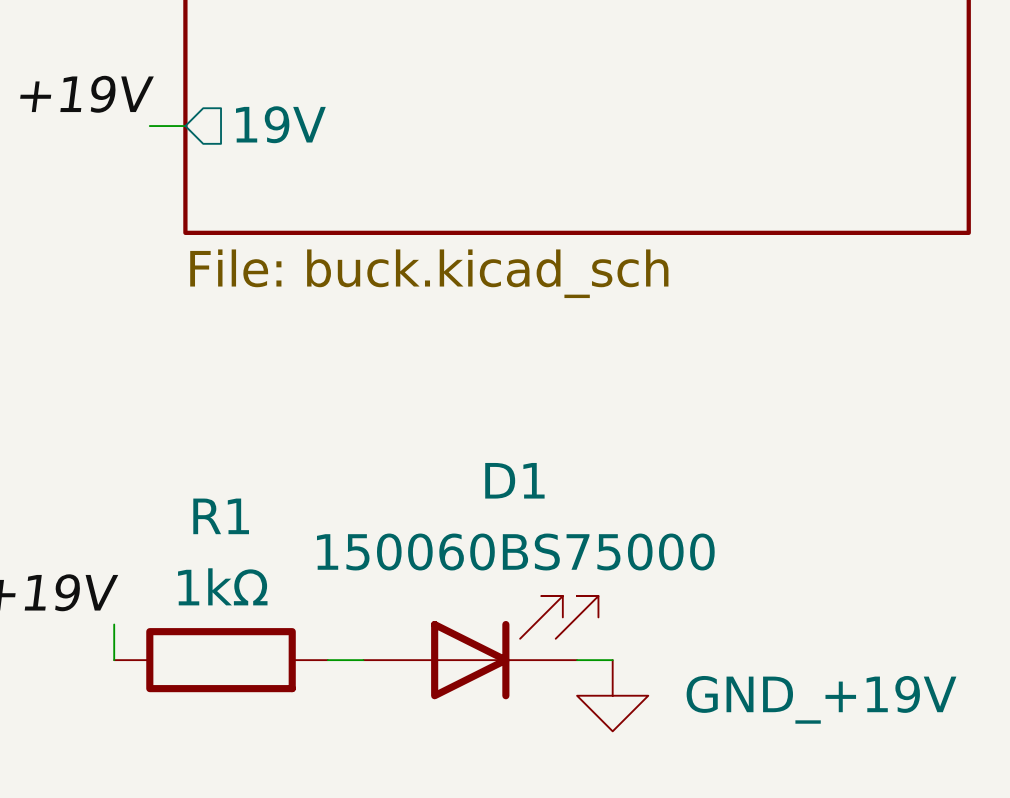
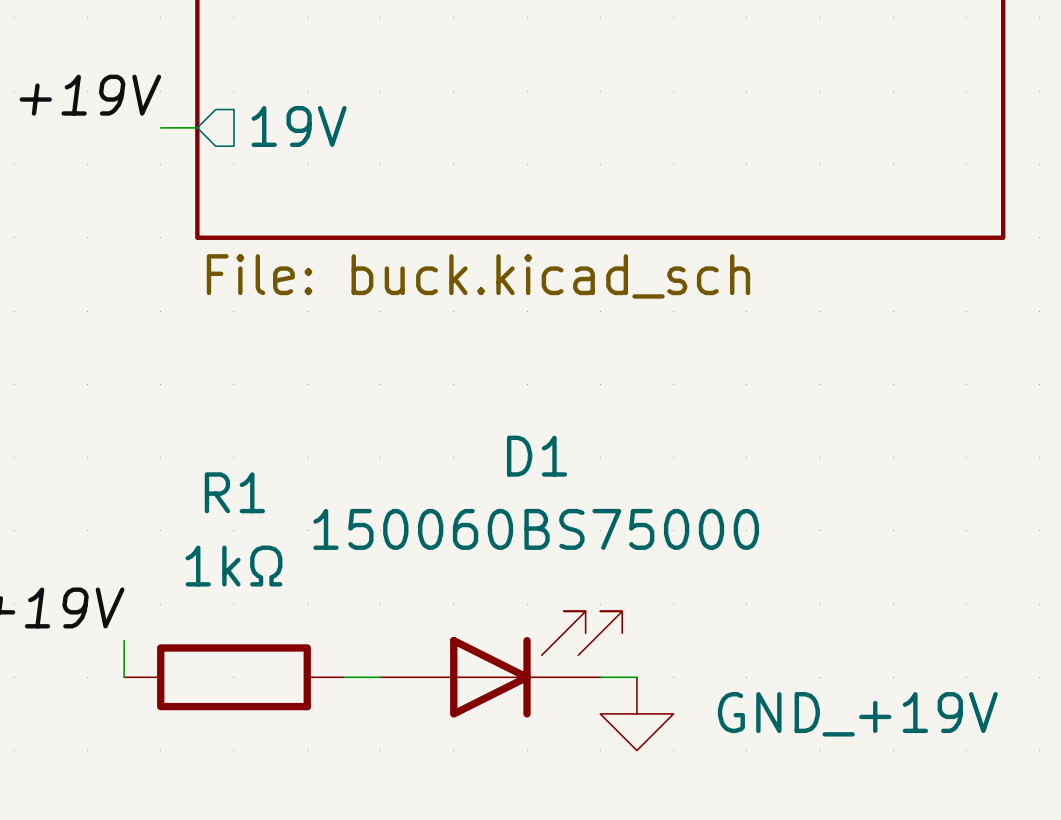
D1 name position: D1 (514, 480) -> D1 (537, 456)
R1 name position: R1 (221, 516) -> R1 (234, 492)
D1 value position: 150060BS75000 (515, 552) -> 150060BS75000 (536, 529)
R1 value position: 1kΩ (222, 586) -> 1kΩ (233, 566)

